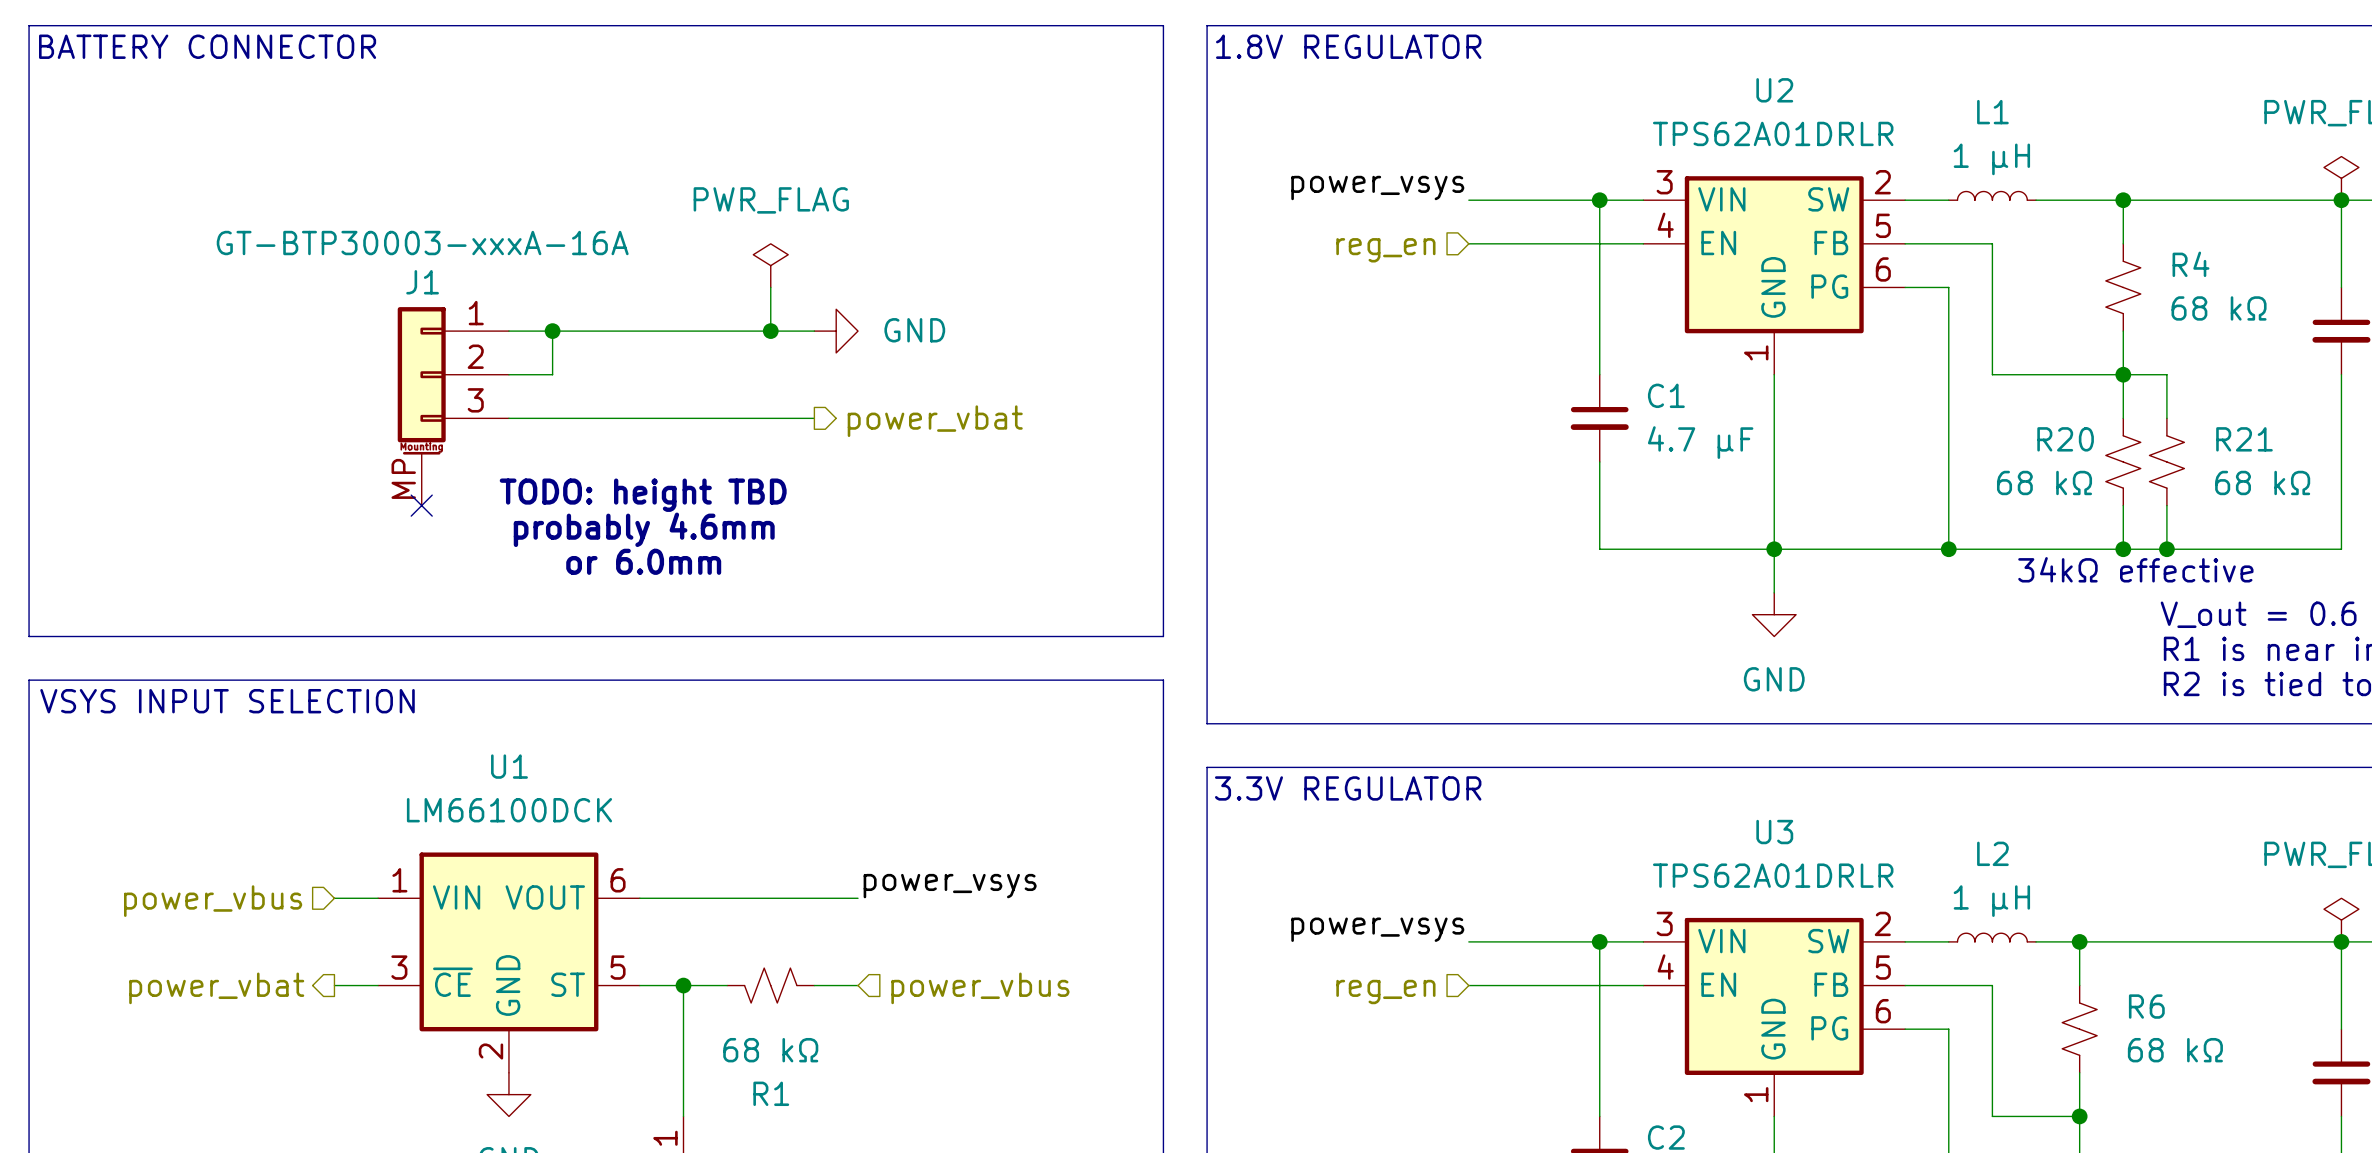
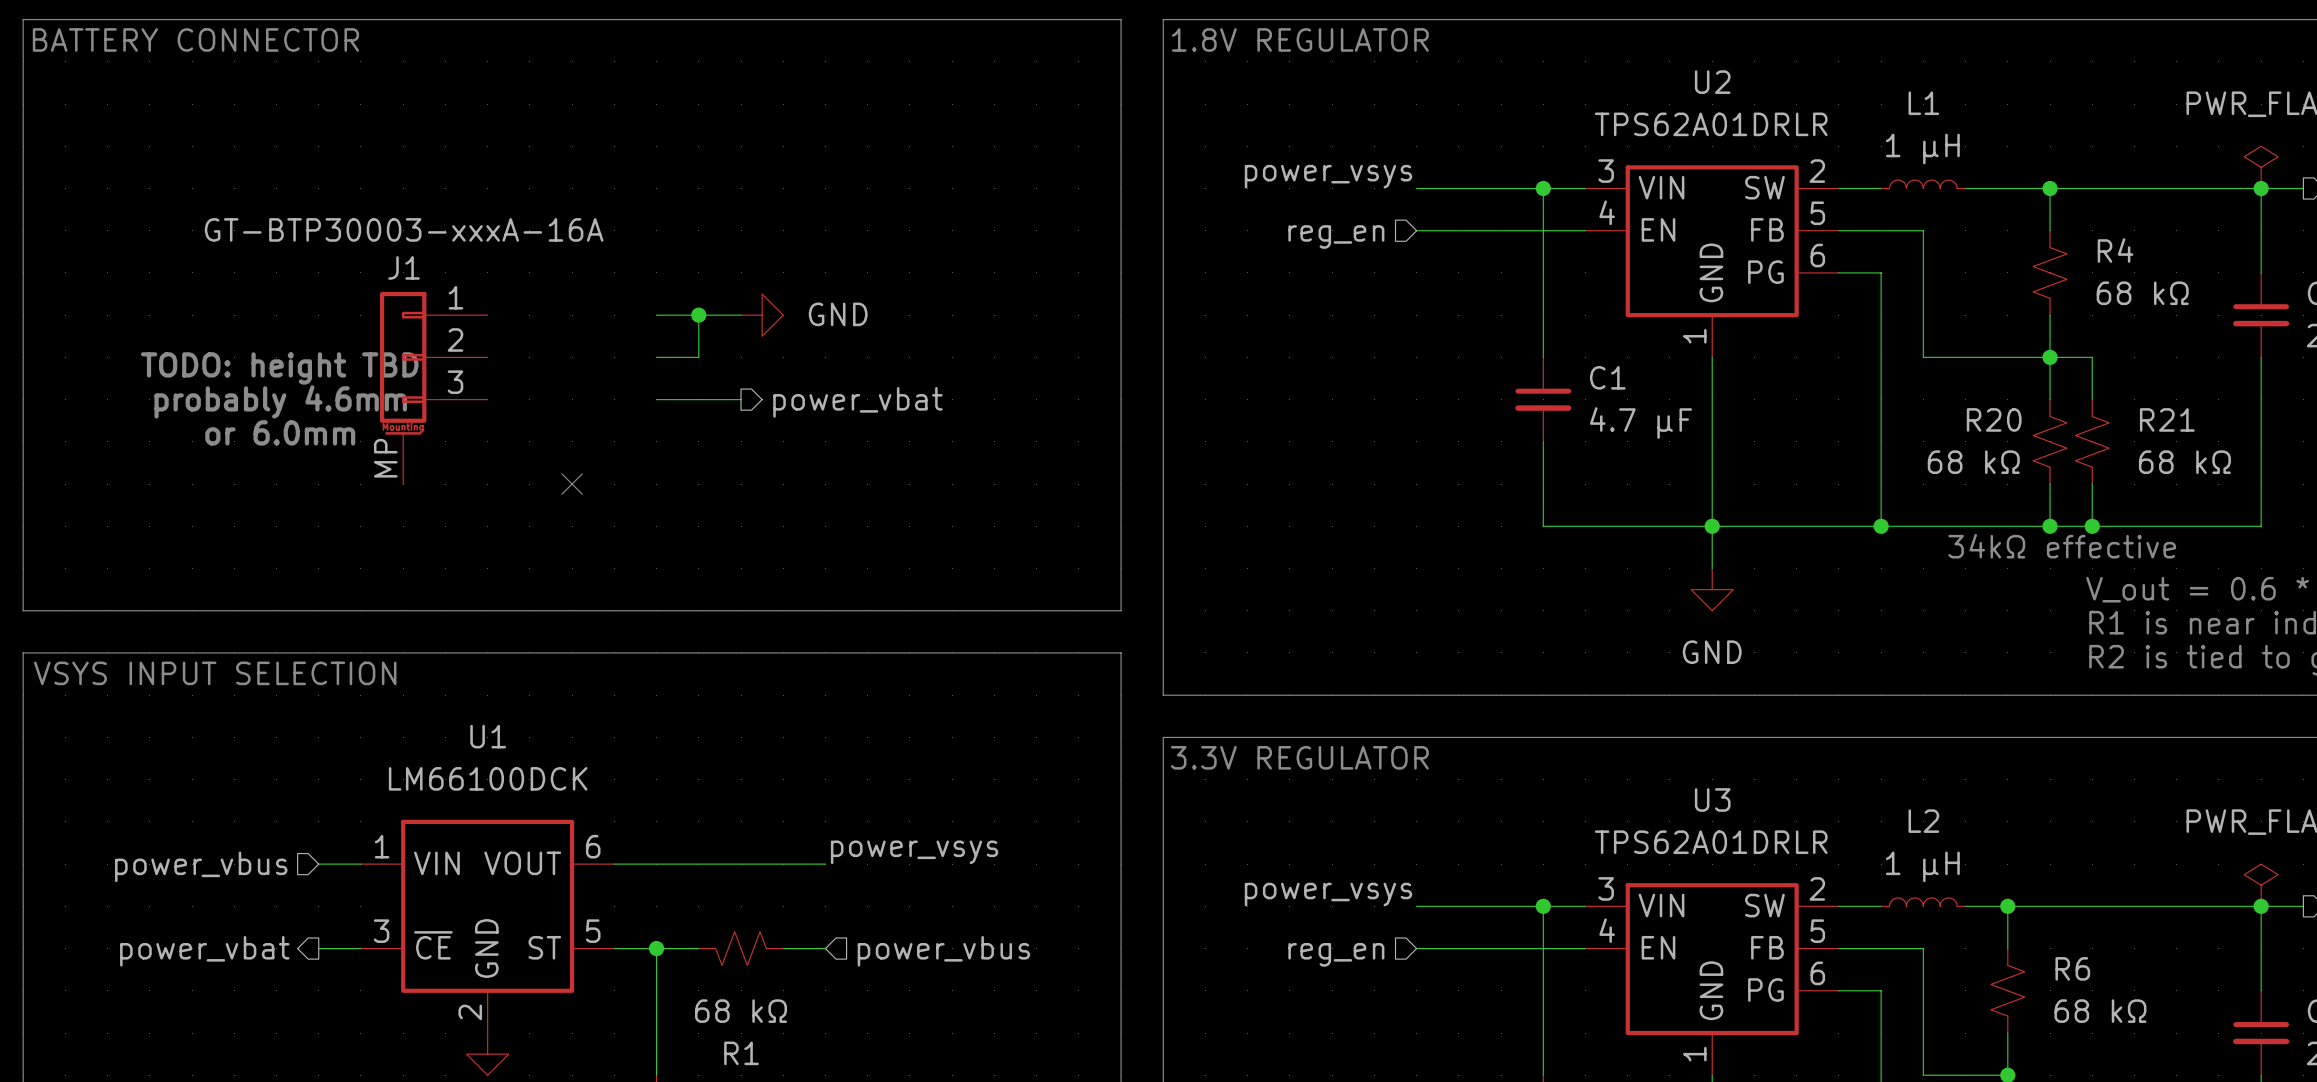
power symbol: PWR_FLAG (770, 265) -> none
wire: (770, 287) (770, 331) (814, 331) -> none
wire: (508, 331) (683, 331) -> none
wire: (552, 331) (552, 374) (508, 374) -> (698, 315) (698, 357) (656, 357)
junction: (552, 331) -> none
junction position: (770, 331) -> (698, 315)
power symbol position: GND (836, 331) -> GND (762, 315)
wire: (508, 418) (683, 418) -> none
wire: (770, 418) (814, 418) -> none
hierarchical label position: power_vbat (935, 421) -> power_vbat (857, 402)
text position: TODO: height TBD (643, 495) -> TODO: height TBD (279, 368)
no-connect mark: (421, 505) -> none
no-connect mark: none -> (572, 484)
text position: probably 4.6mm (644, 529) -> probably 4.6mm (280, 401)
text position: or 6.0mm (643, 561) -> or 6.0mm (280, 432)

